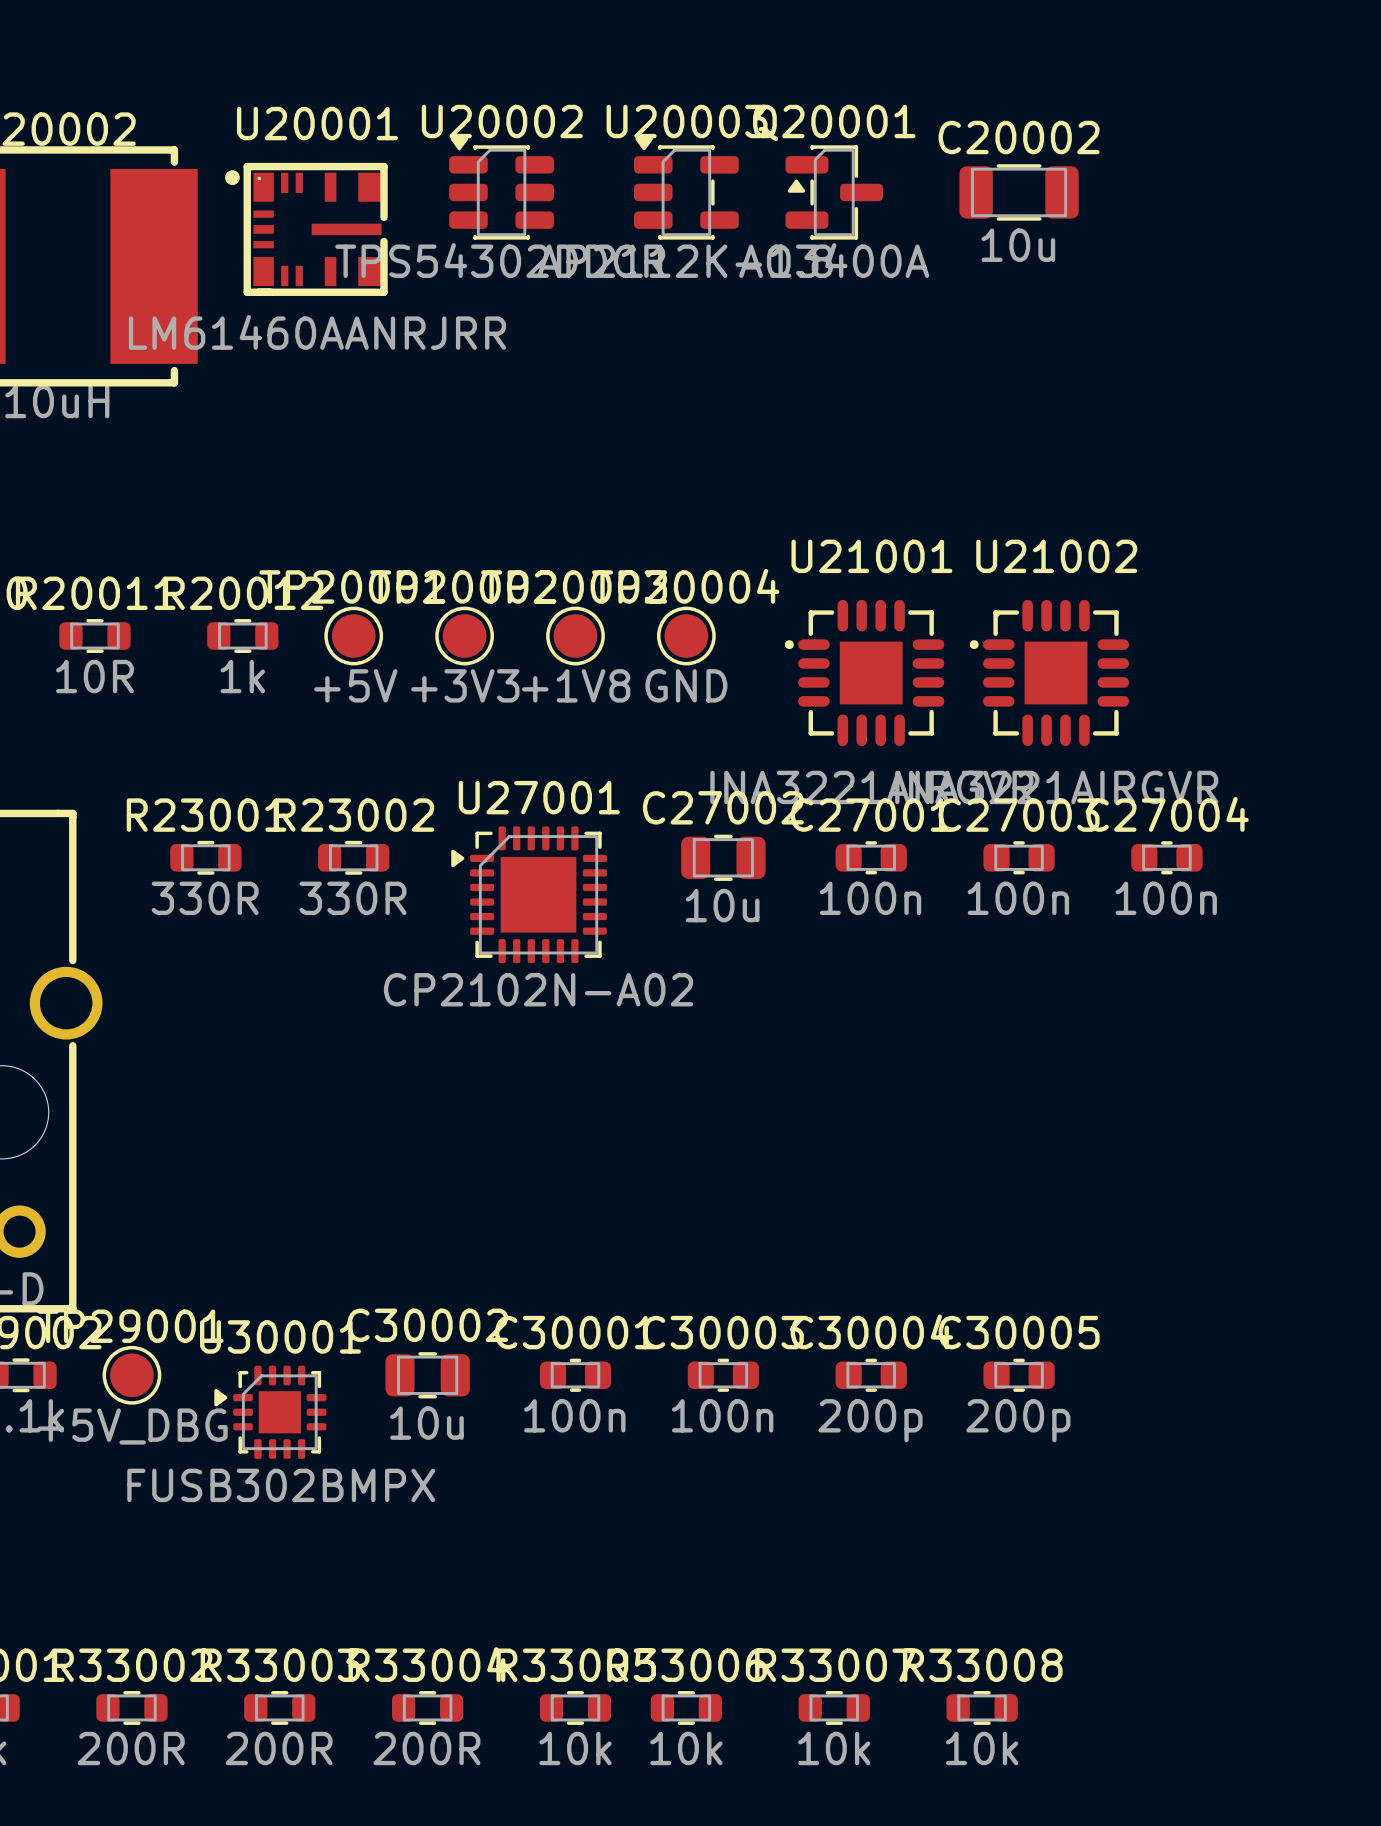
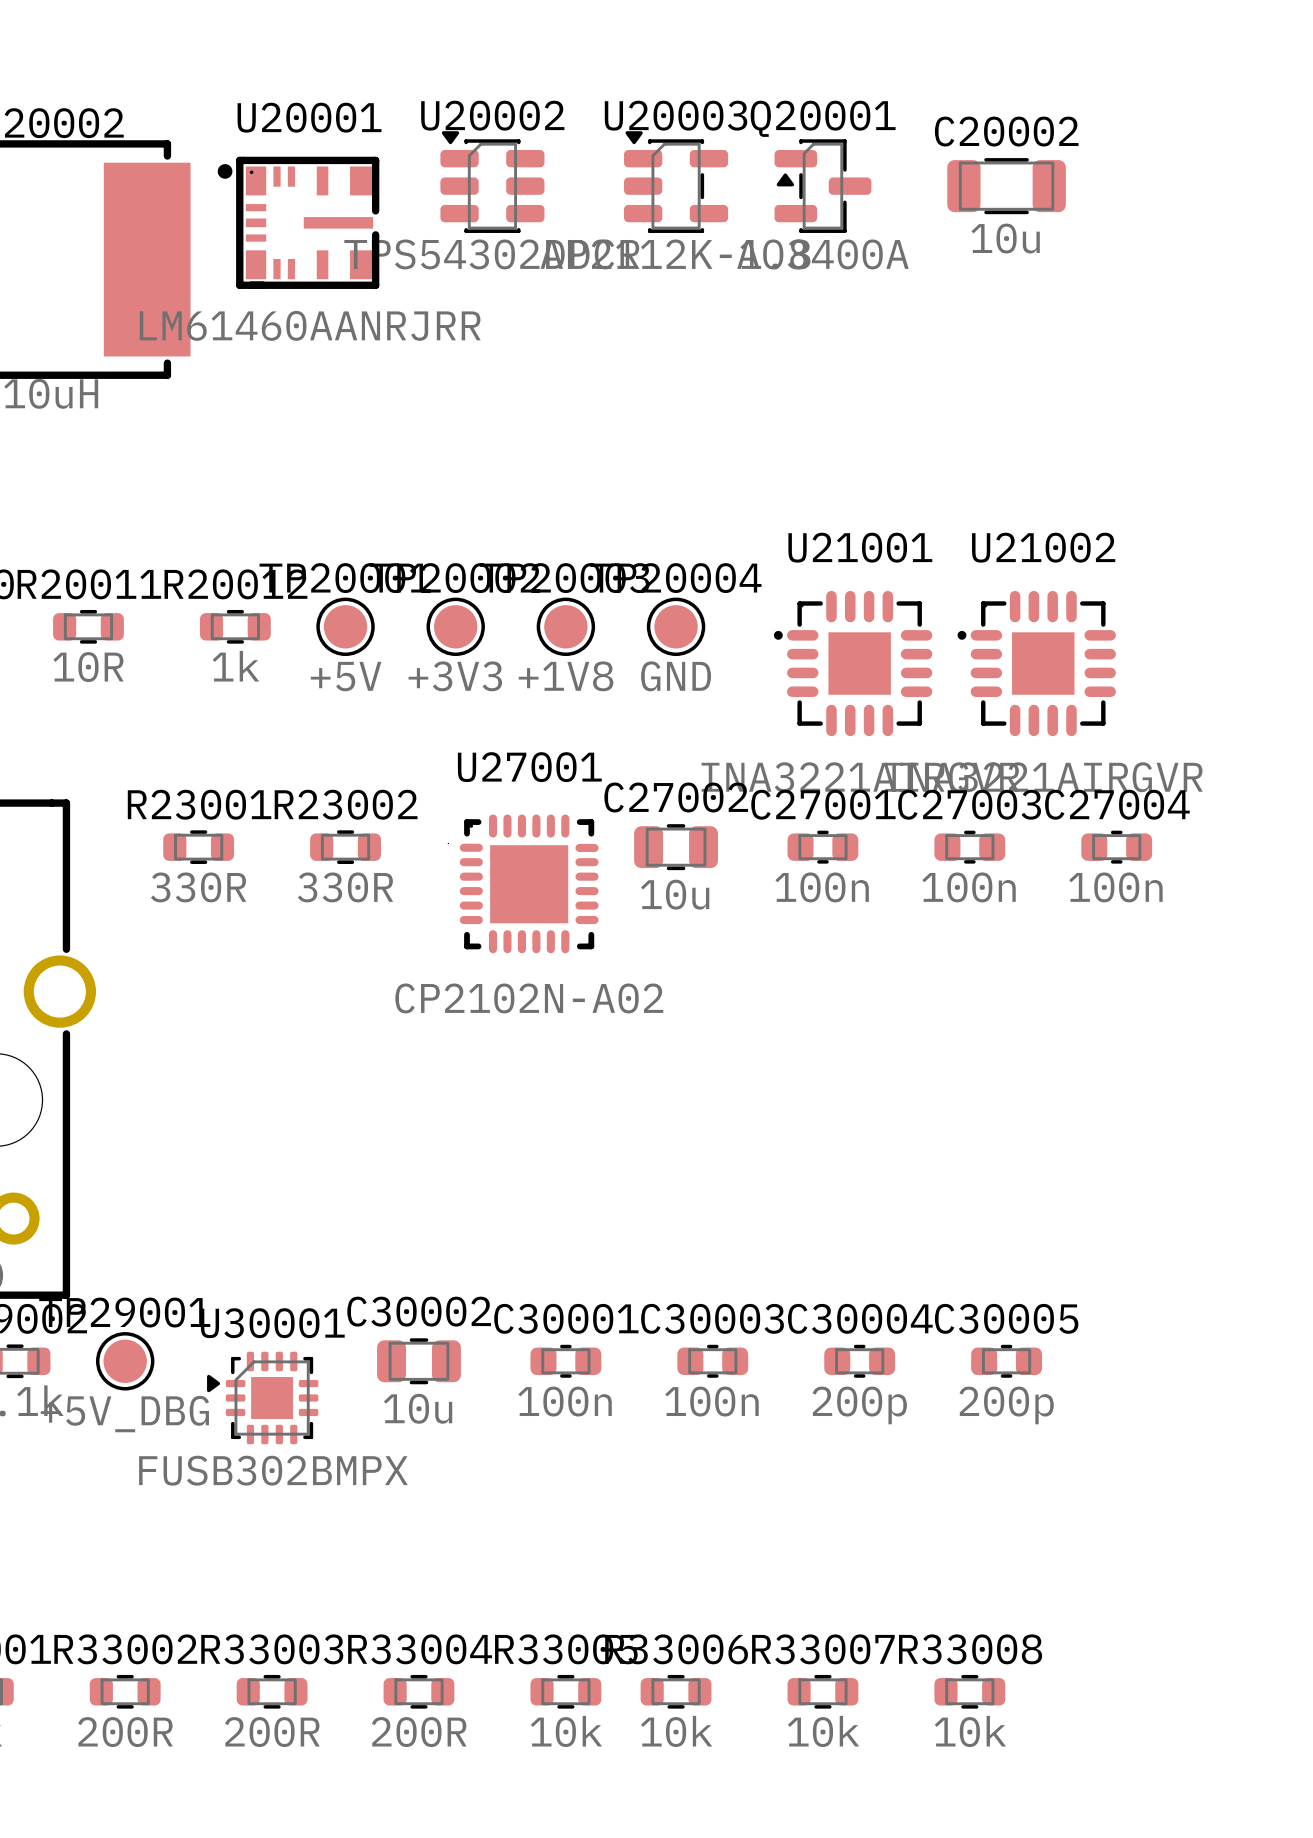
U27001 footprint: [451, 826, 607, 964] -> [448, 814, 599, 954]
C27002 position: (723, 857) -> (676, 847)
C27001 position: (871, 857) -> (822, 847)
C27003 position: (1019, 857) -> (969, 847)
C27004 position: (1166, 857) -> (1116, 847)

